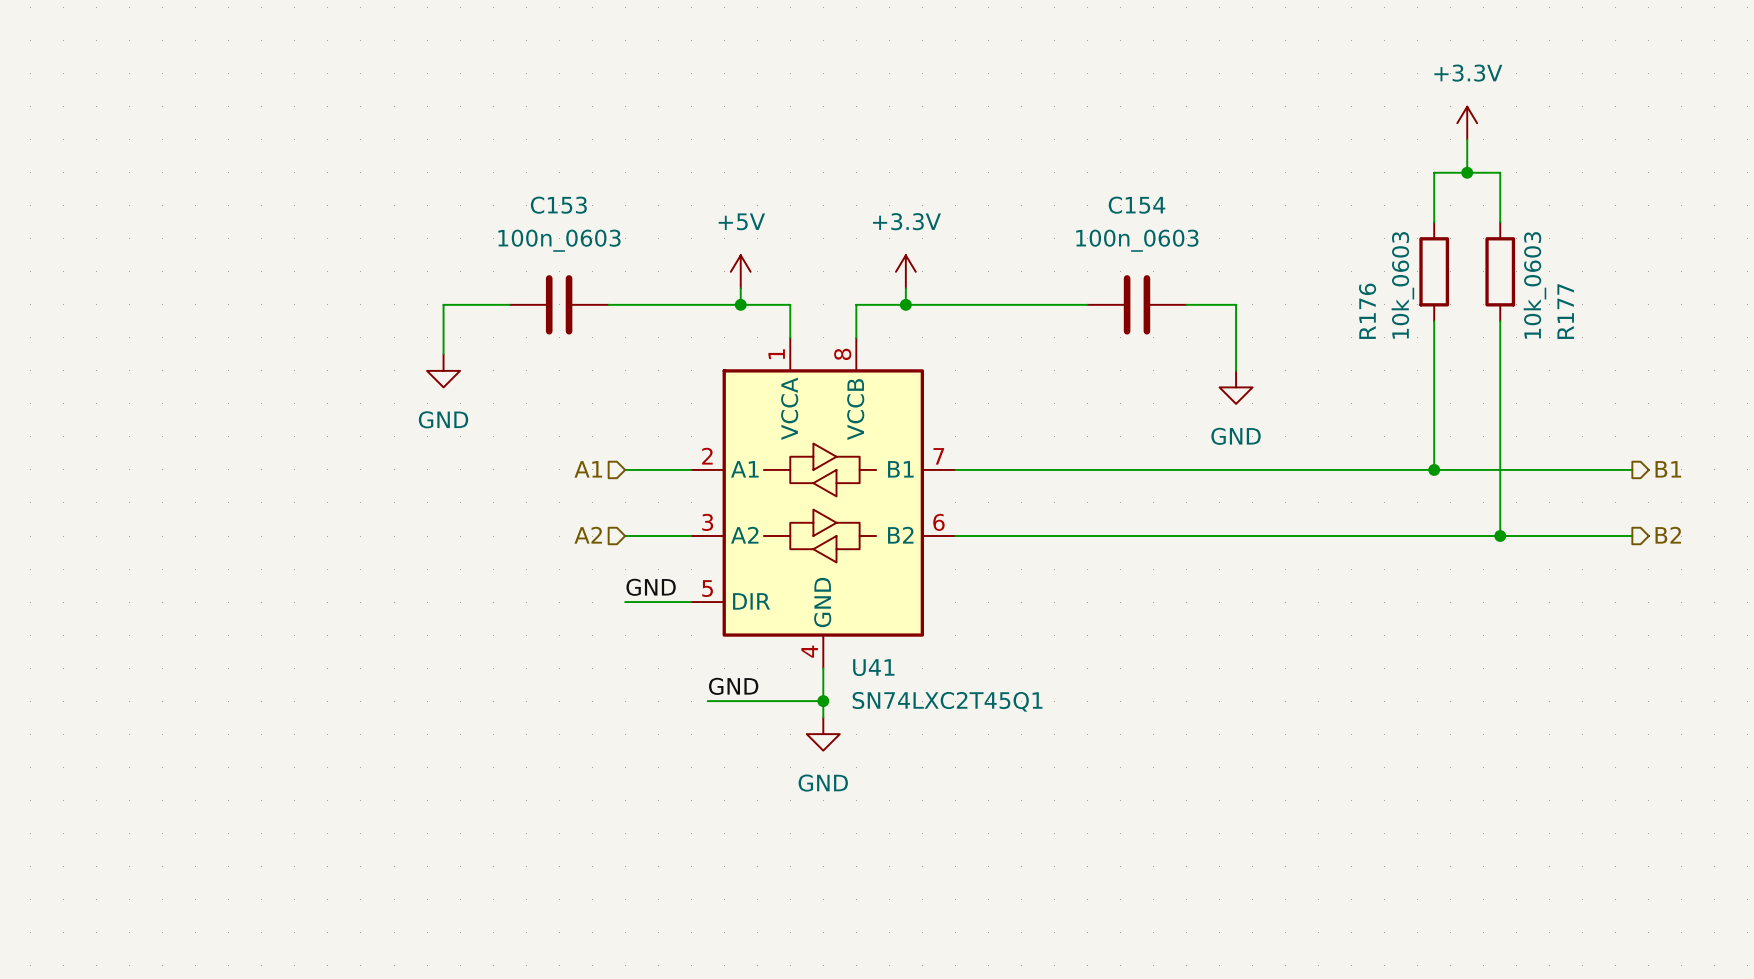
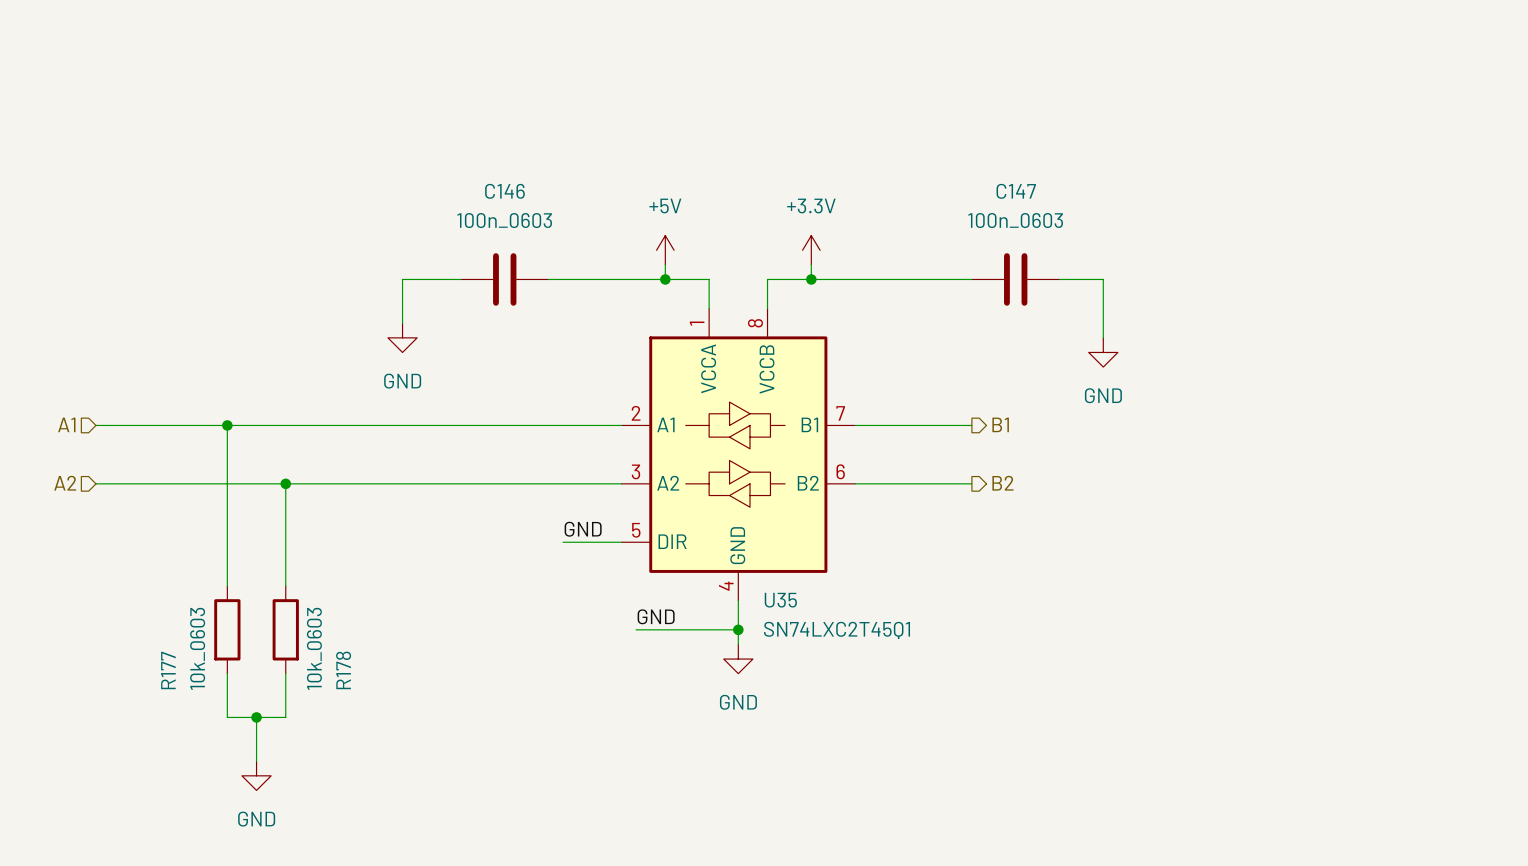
power symbol: +3.3V (1467, 123) -> none
wire: (1467, 139) (1467, 172) -> none
junction: (1467, 172) -> none
C153 name: C153 (558, 205) -> C146 (504, 191)
C154 name: C154 (1137, 205) -> C147 (1016, 191)
wire: (1434, 222) (1434, 172) (1500, 172) (1500, 222) -> none
R176: 10k_0603 (1434, 271) -> none
R177 position: (1500, 271) -> (227, 629)
R177 value position: 10k_0603 (1534, 285) -> 10k_0603 (197, 648)
R177 name position: R177 (1565, 311) -> R177 (168, 670)
wire: (1434, 321) (1434, 469) -> none
wire: (1500, 321) (1500, 536) -> none
hierarchical label: none -> A1 (66, 424)
wire: none -> (95, 425) (563, 425)
wire: none -> (227, 425) (227, 586)
junction: none -> (227, 425)
hierarchical label: A1 (588, 469) -> none
wire: (1087, 469) (1632, 469) -> none
hierarchical label: none -> B1 (1000, 424)
junction: (1434, 469) -> none
hierarchical label: B1 (1668, 469) -> none
hierarchical label: none -> A2 (65, 483)
hierarchical label: A2 (588, 535) -> none
hierarchical label: none -> B2 (1002, 483)
hierarchical label: B2 (1668, 535) -> none
wire: none -> (95, 483) (563, 483)
wire: none -> (285, 483) (285, 586)
junction: none -> (285, 483)
wire: (1087, 536) (1632, 536) -> none
junction: (1500, 536) -> none
U41 name: U41 (873, 667) -> U35 (780, 600)
R178: none -> 10k_0603 (285, 629)
wire: none -> (227, 673) (227, 717) (285, 717) (285, 673)
wire: none -> (256, 717) (256, 761)
junction: none -> (256, 717)
power symbol: none -> GND (256, 775)

